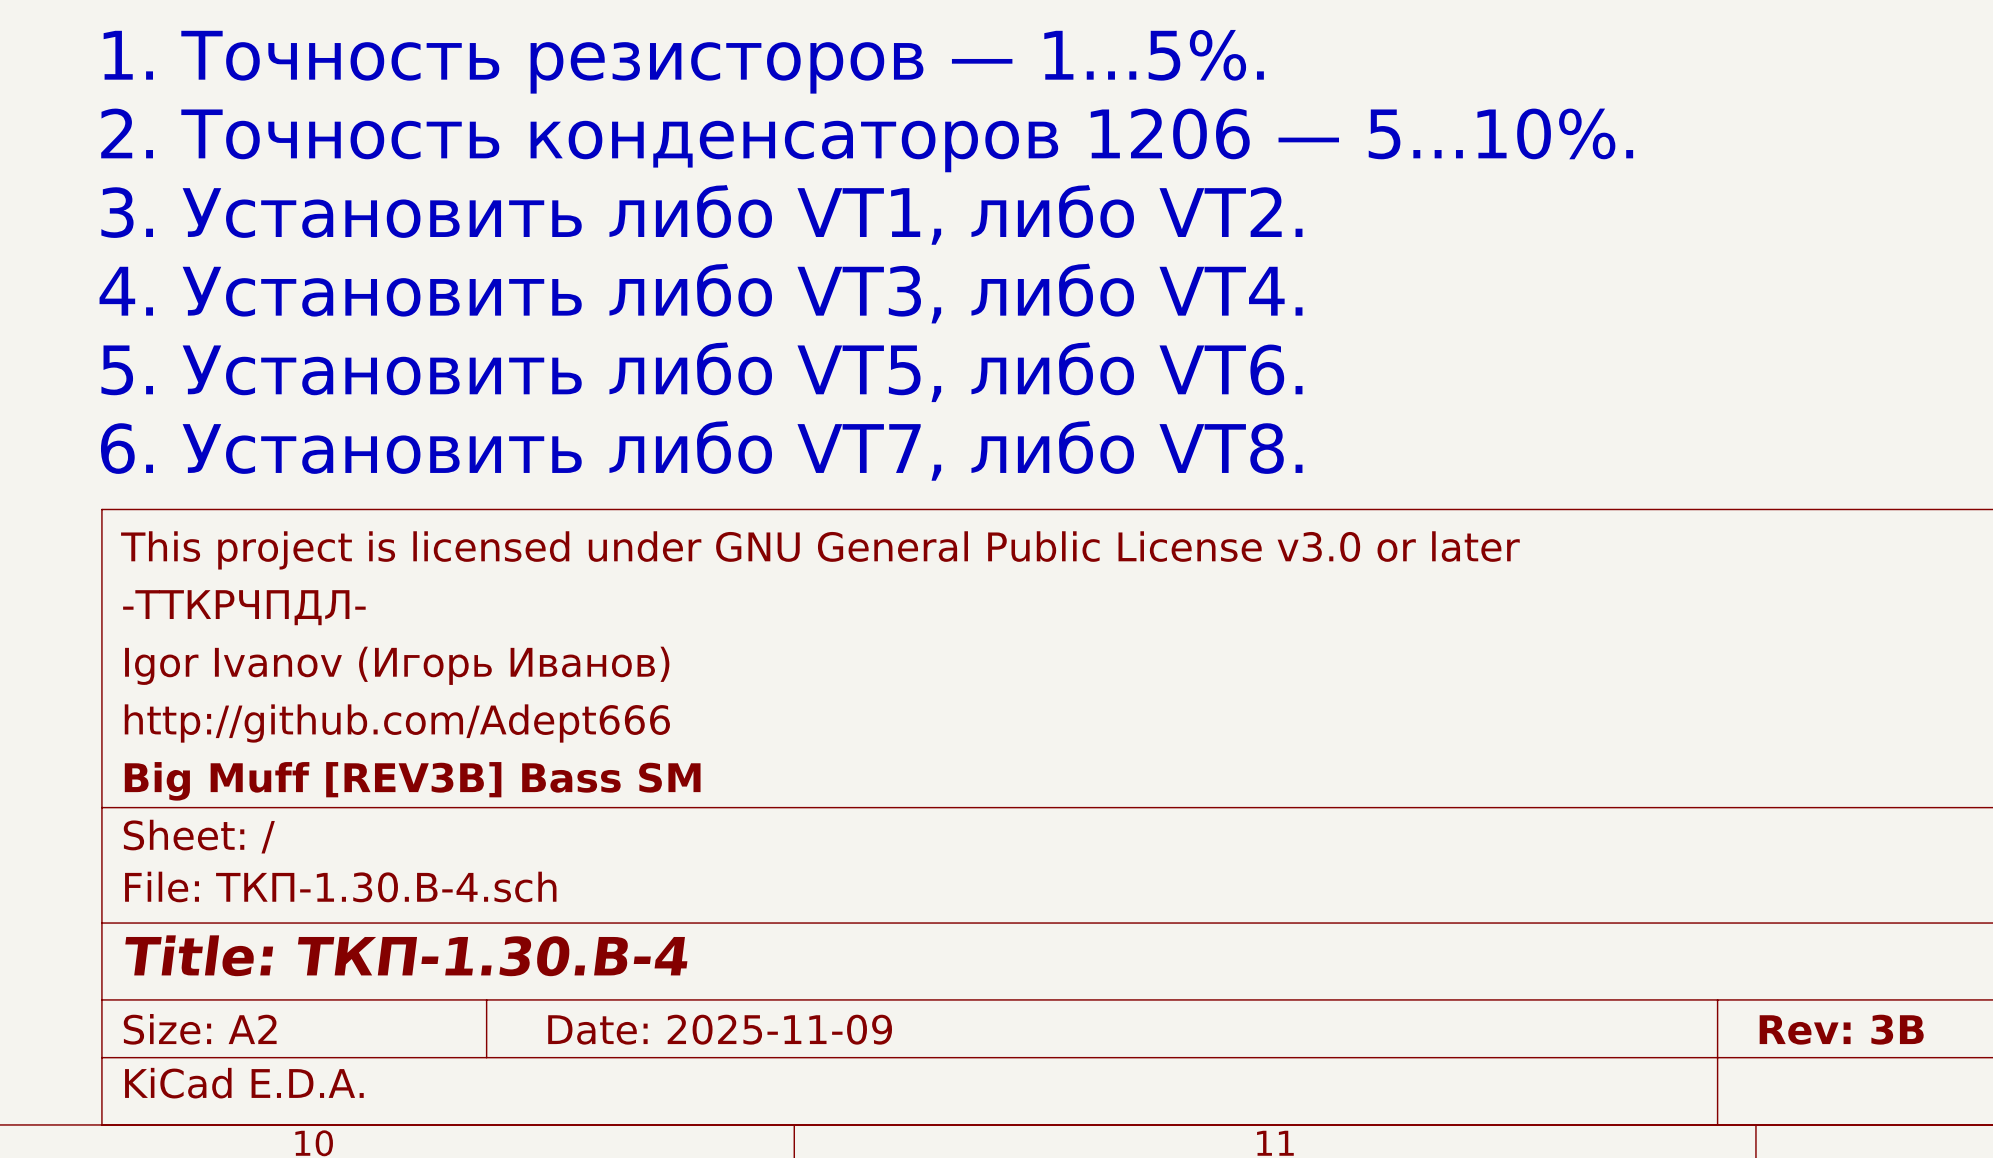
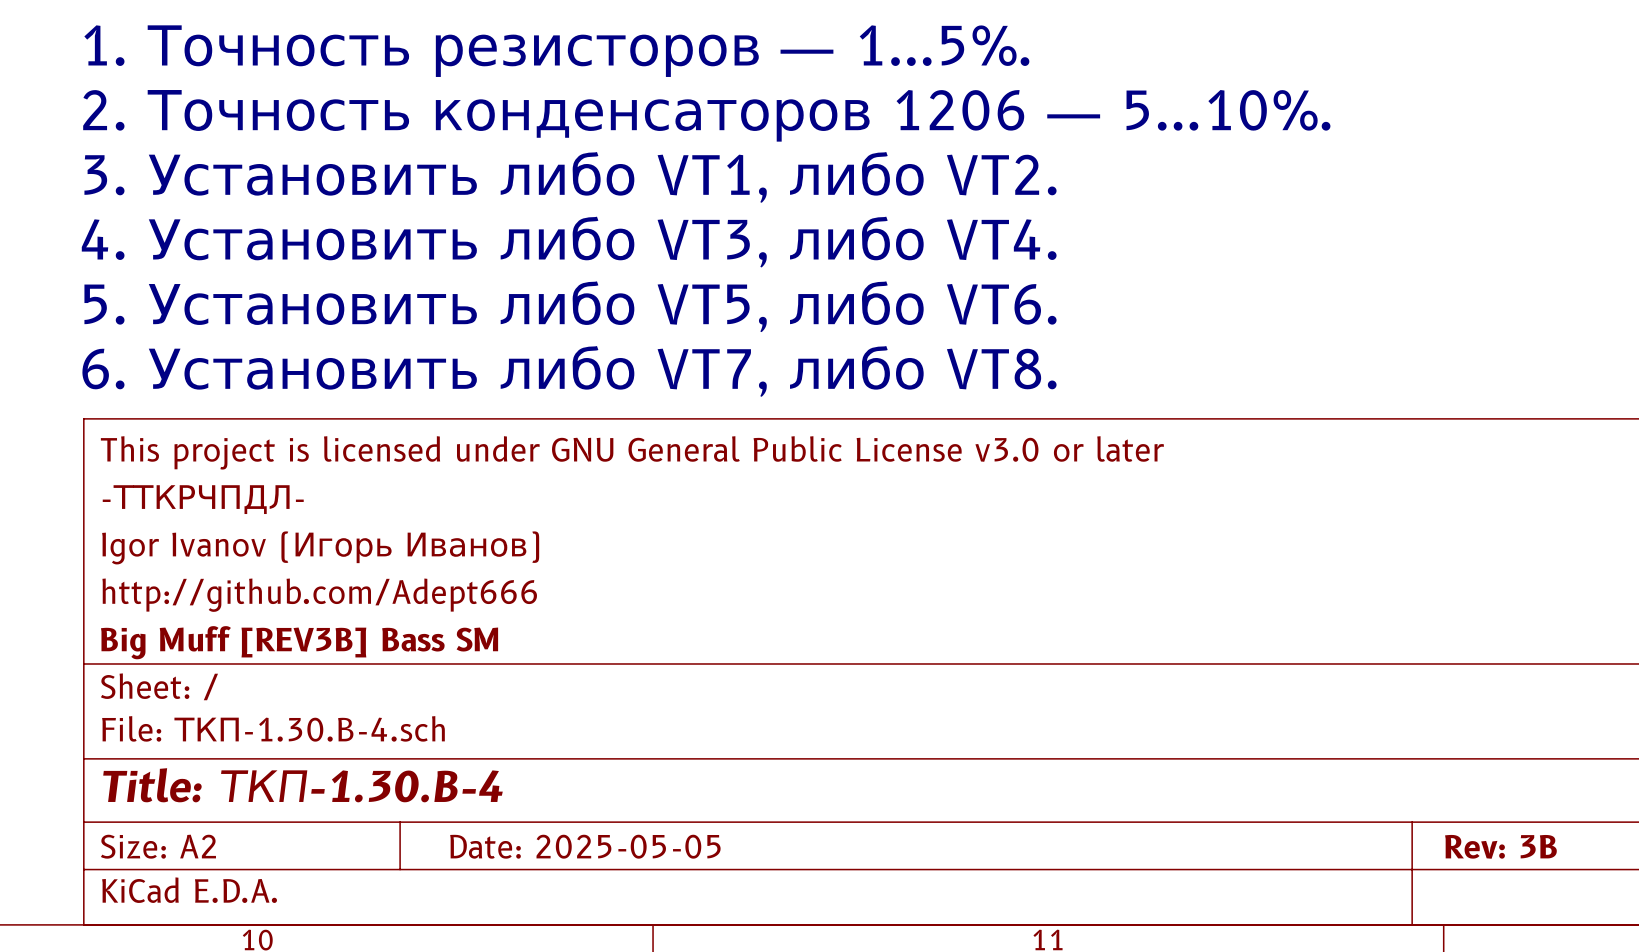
title block: Date: 2025-11-09 (720, 1029) -> Date: 2025-05-05 (585, 846)

